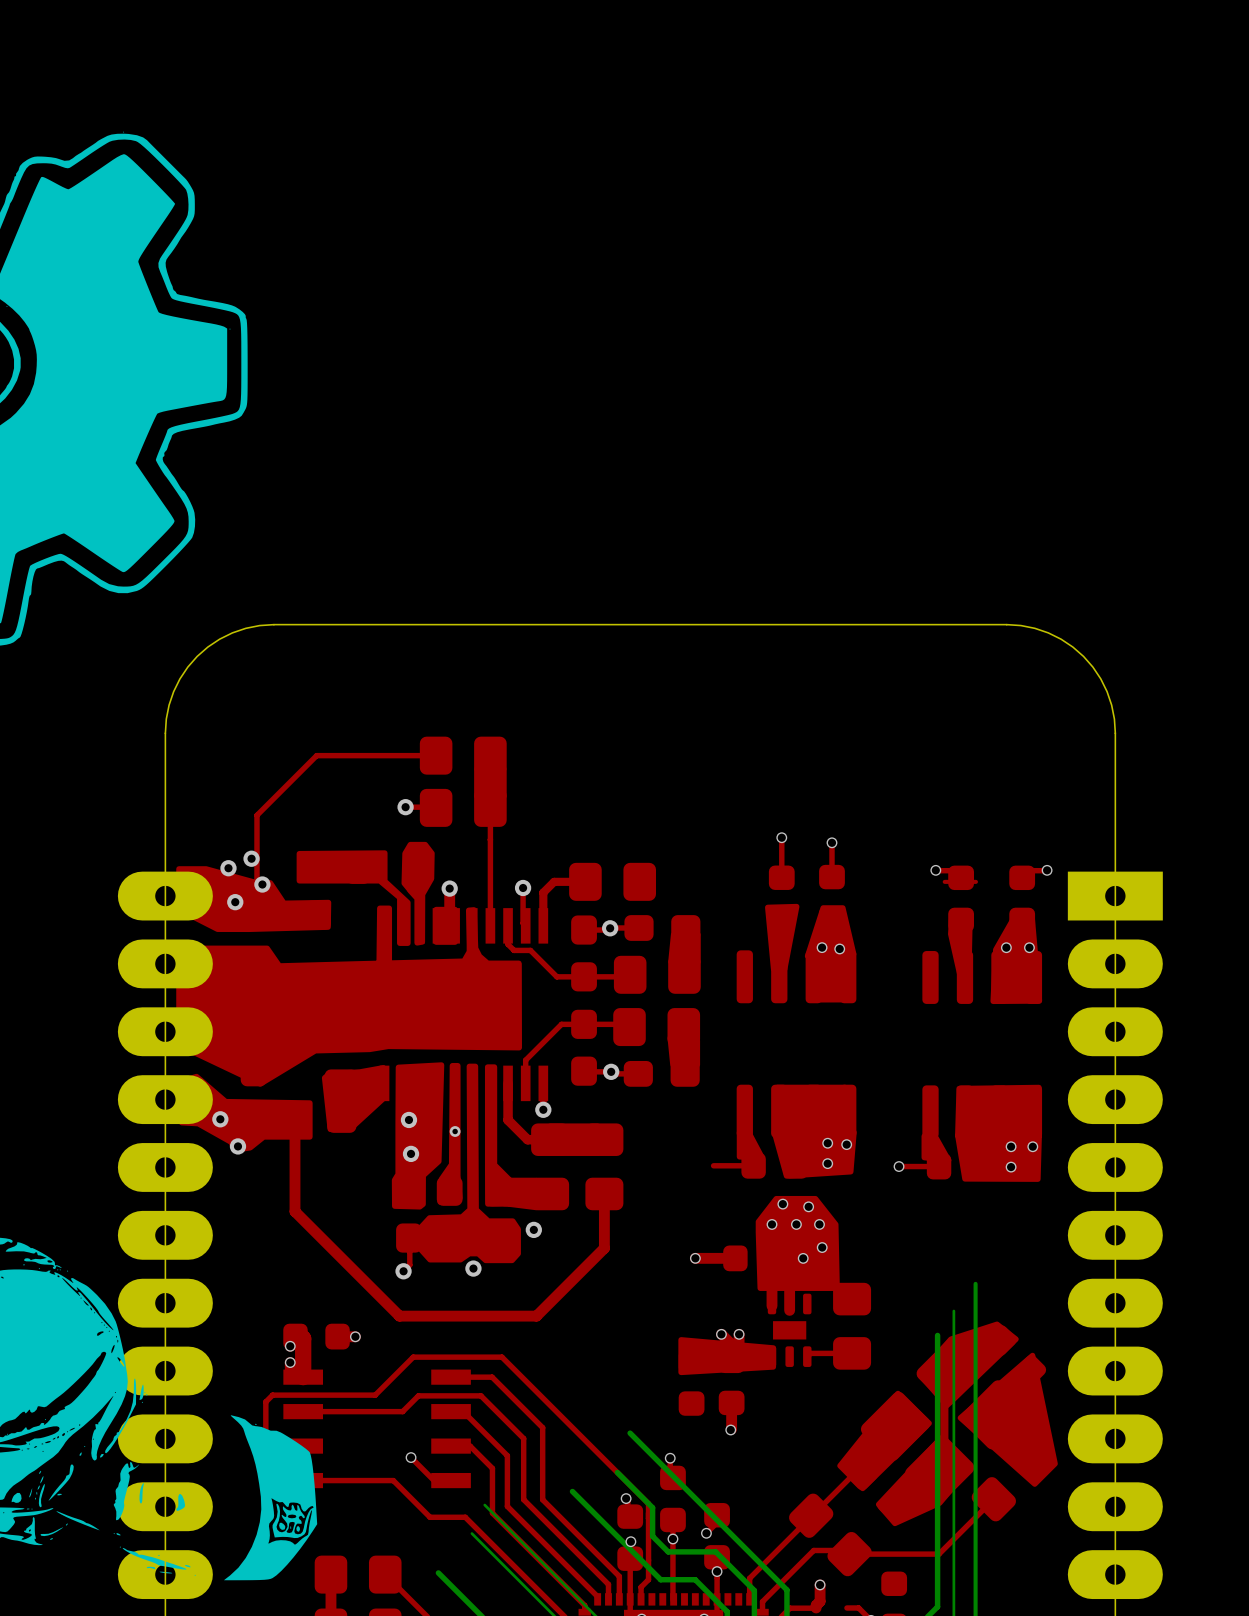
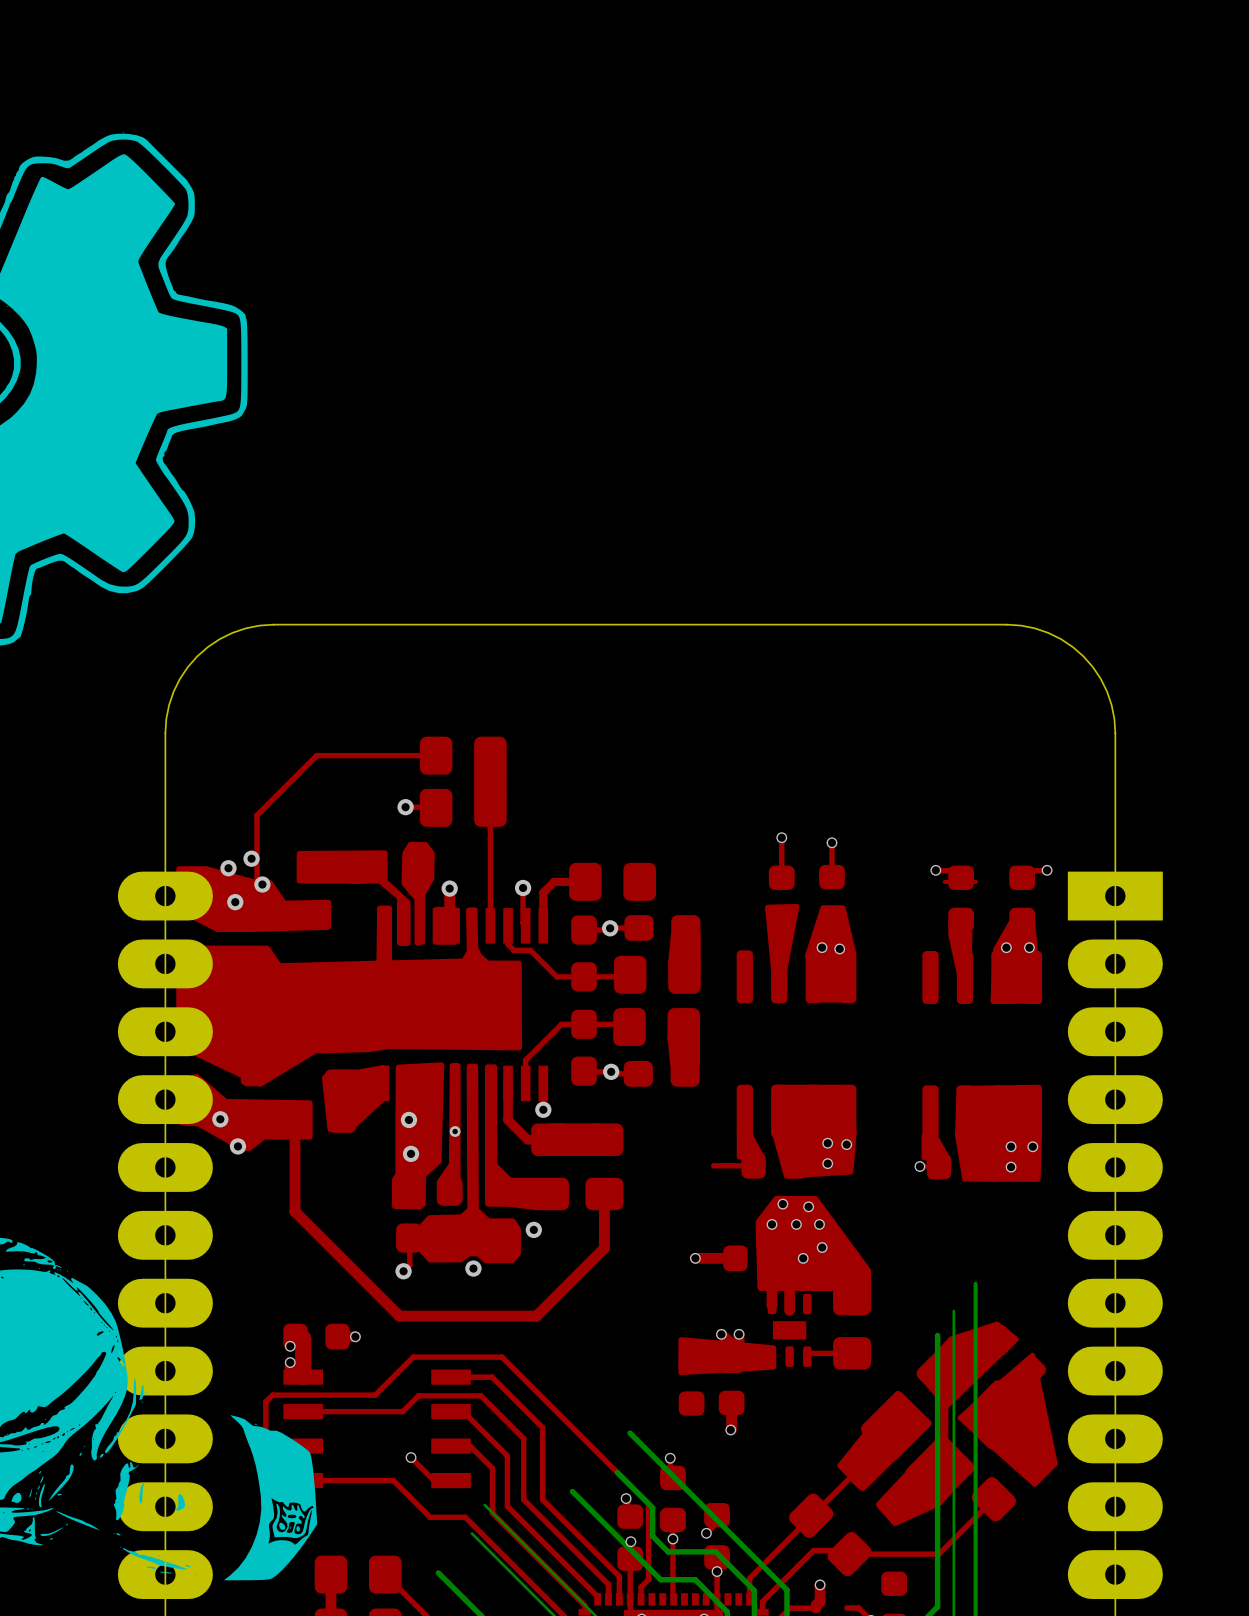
via position: (899, 1166) -> (919, 1166)
top track: (919, 1166) (899, 1166) -> none
drawing shape: [755, 1195, 840, 1291] -> [755, 1195, 872, 1291]

